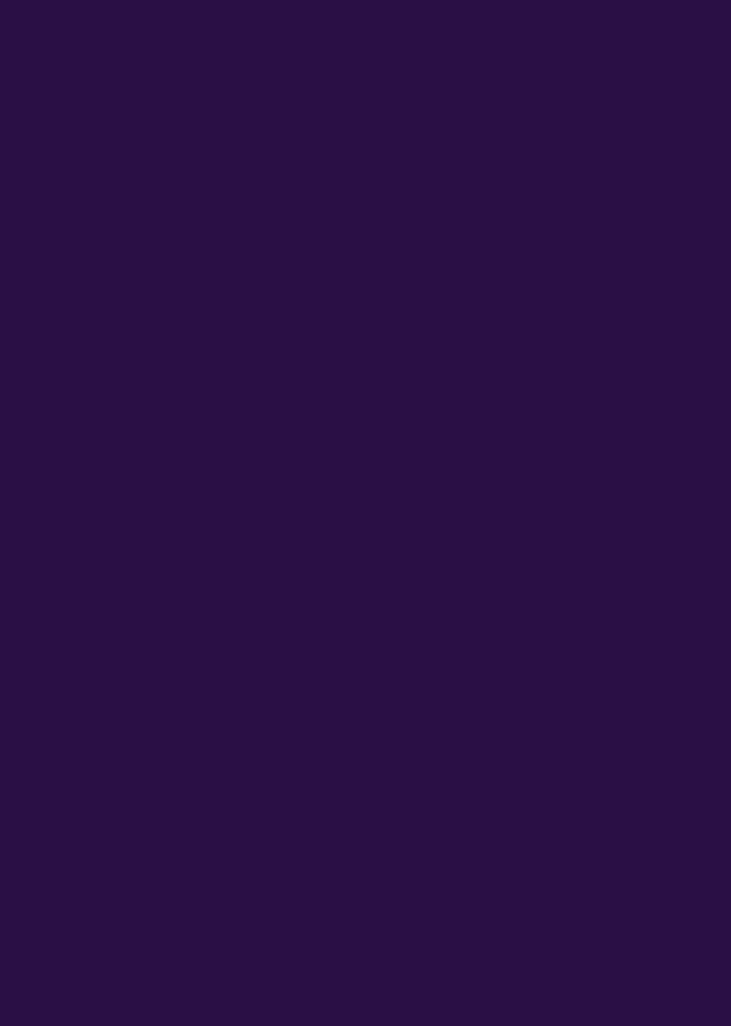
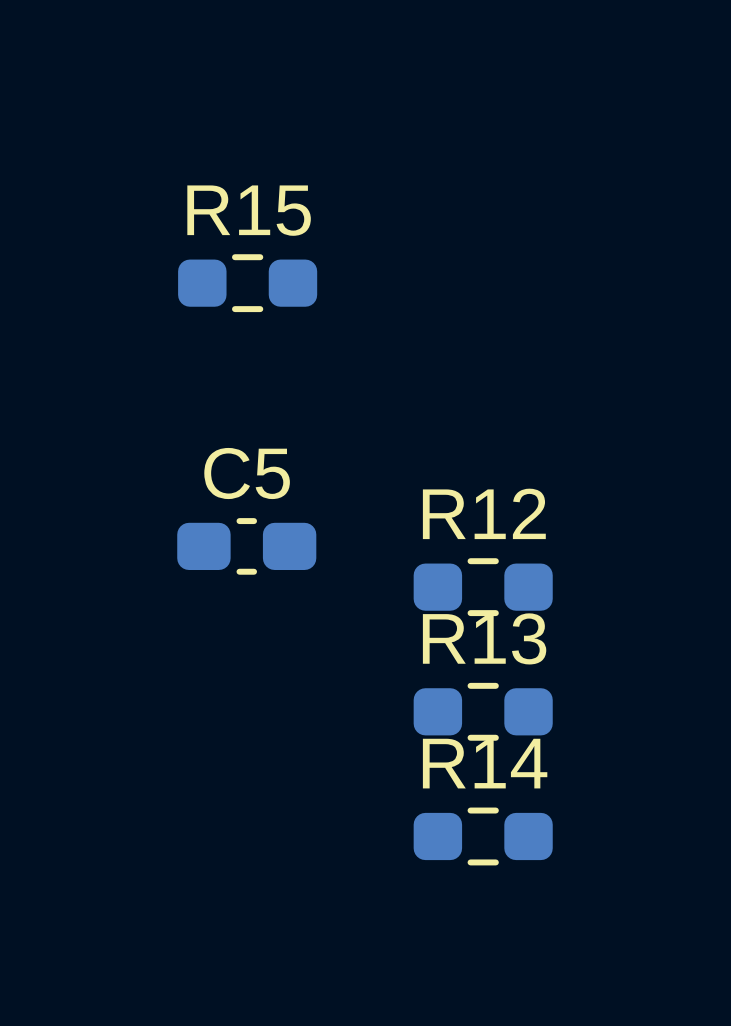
R15: none -> (247, 283)
C5: none -> (246, 546)
R12: none -> (483, 587)
R13: none -> (483, 711)
R14: none -> (483, 836)

